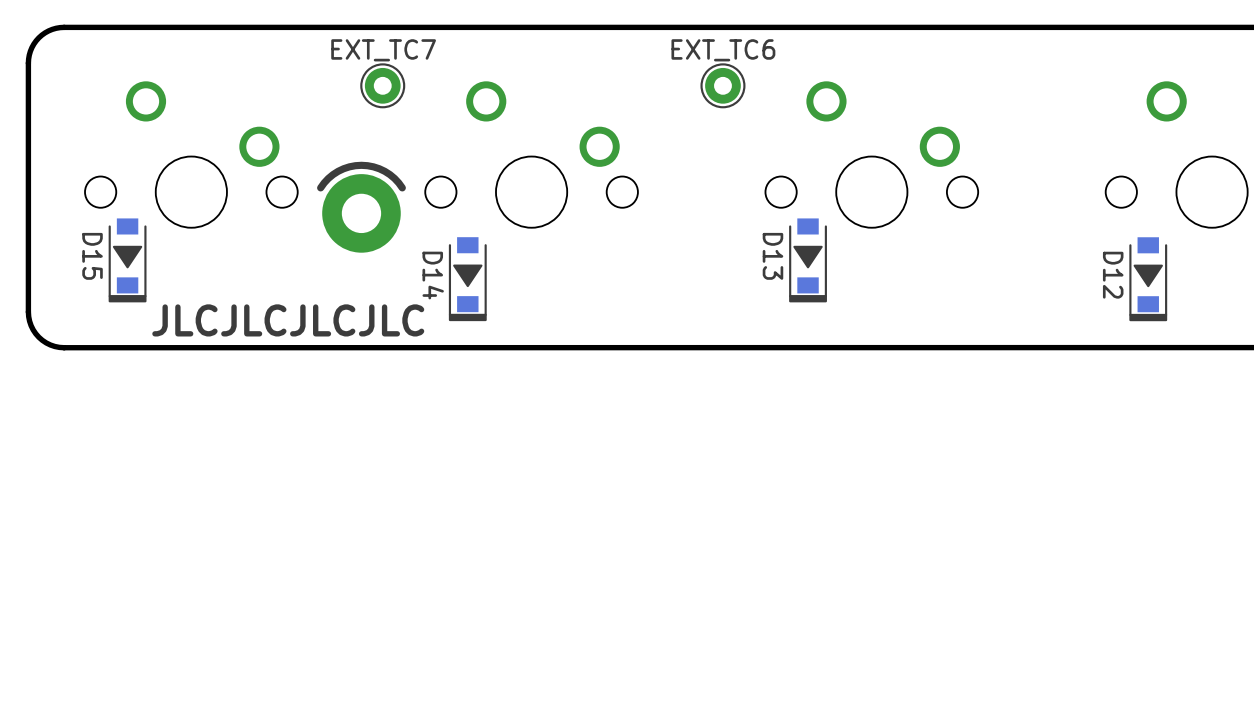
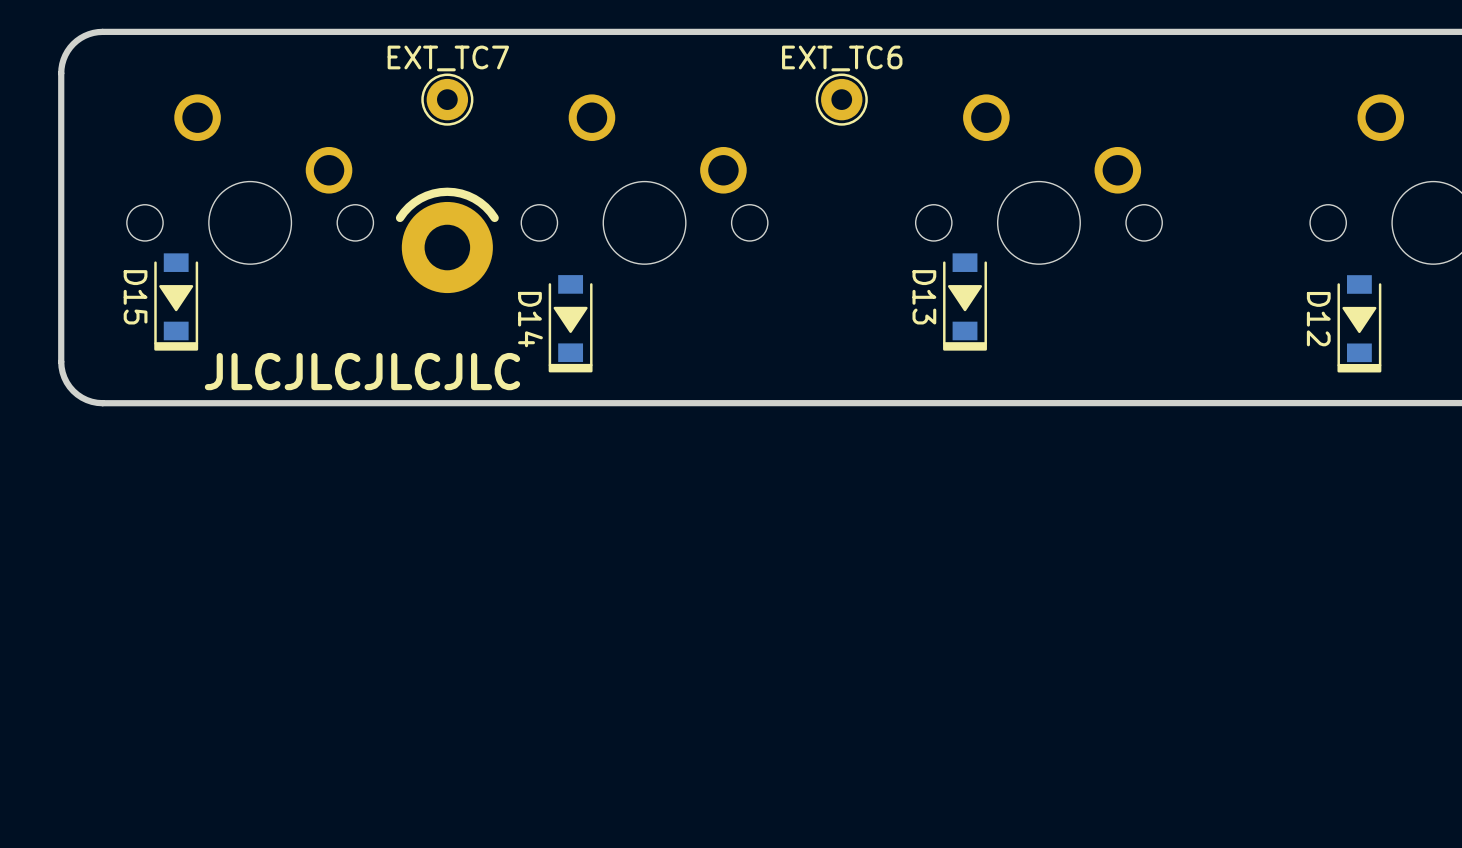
EXT_TC7 position: (382, 85) -> (447, 99)
EXT_TC6 position: (722, 85) -> (841, 99)

